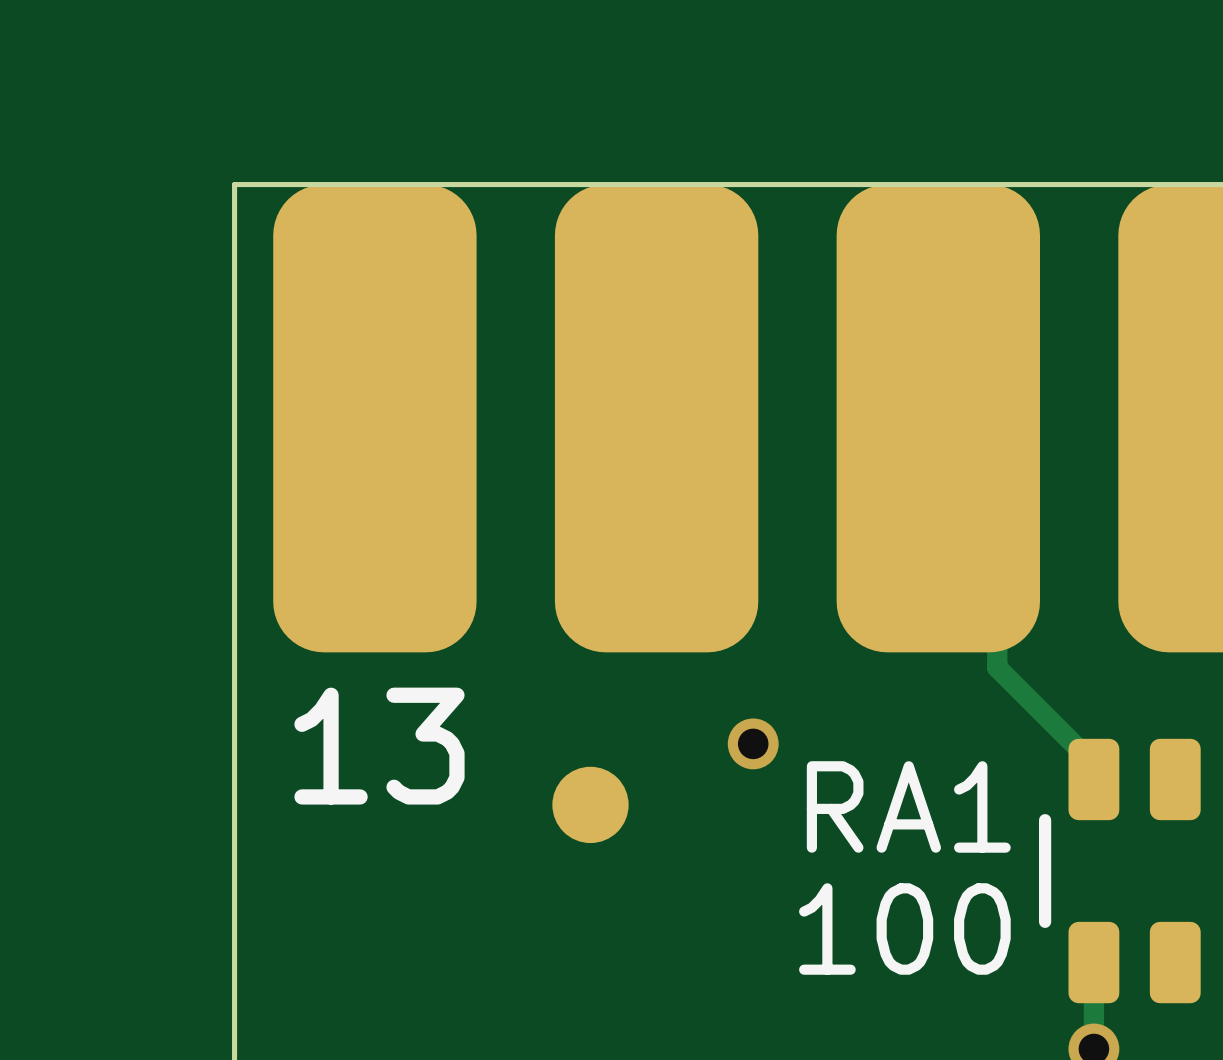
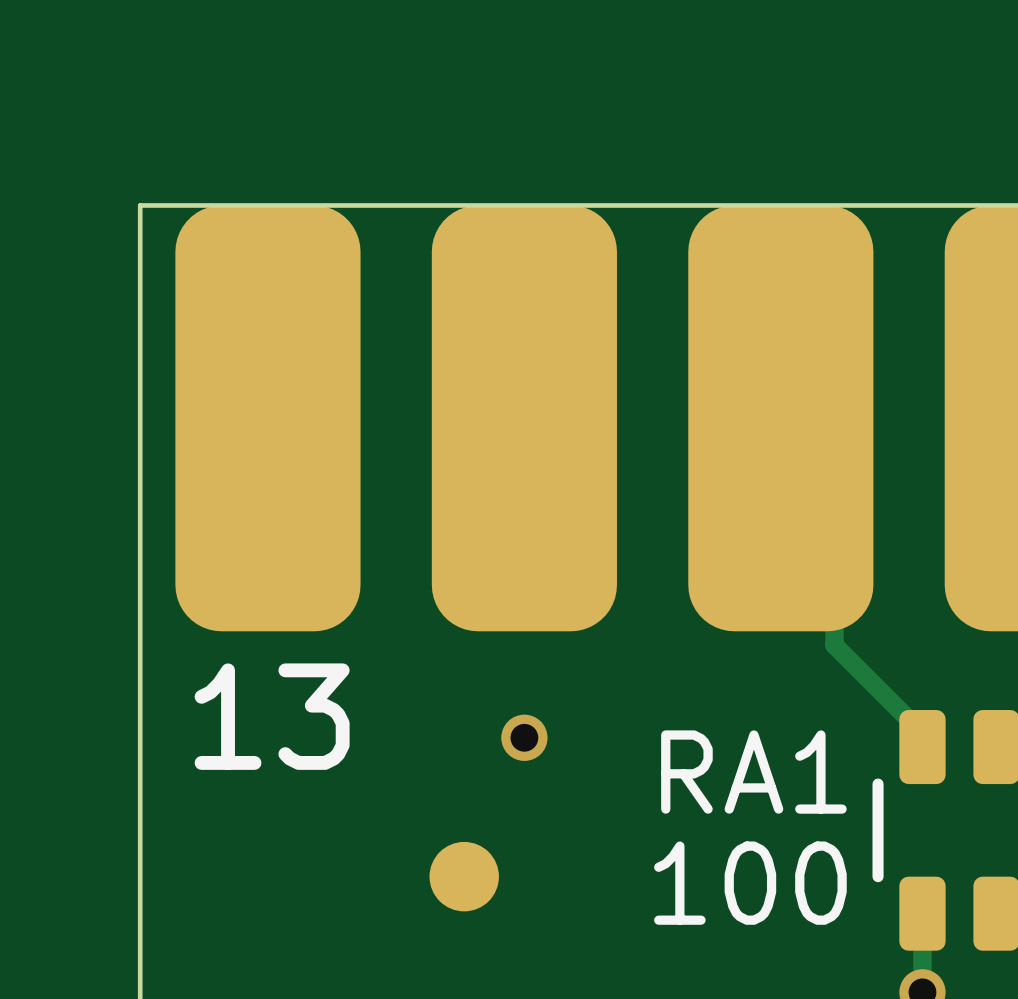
via position: (753, 743) -> (524, 737)
part position: (590, 804) -> (464, 876)

